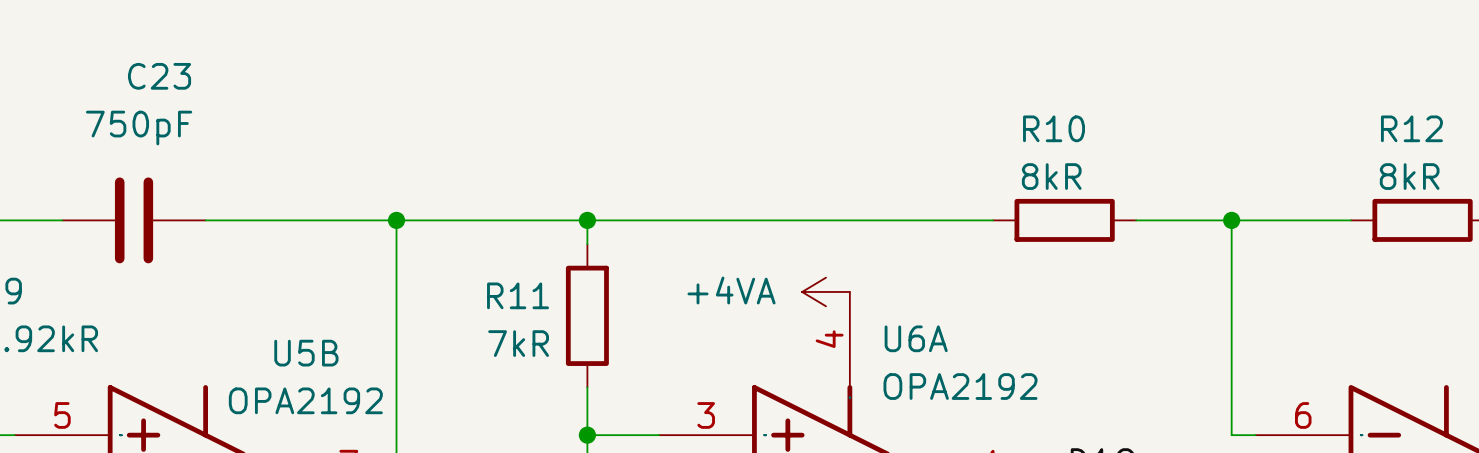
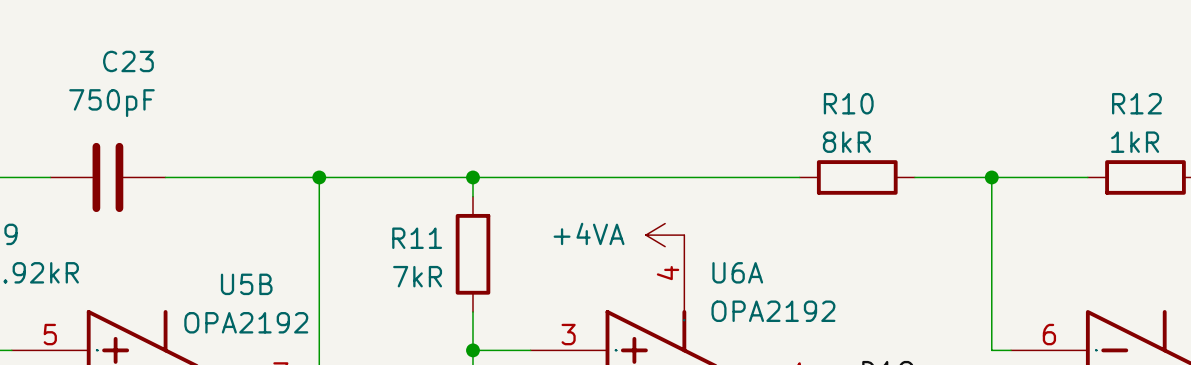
R12 value: 8kR (1409, 176) -> 1kR (1135, 142)

